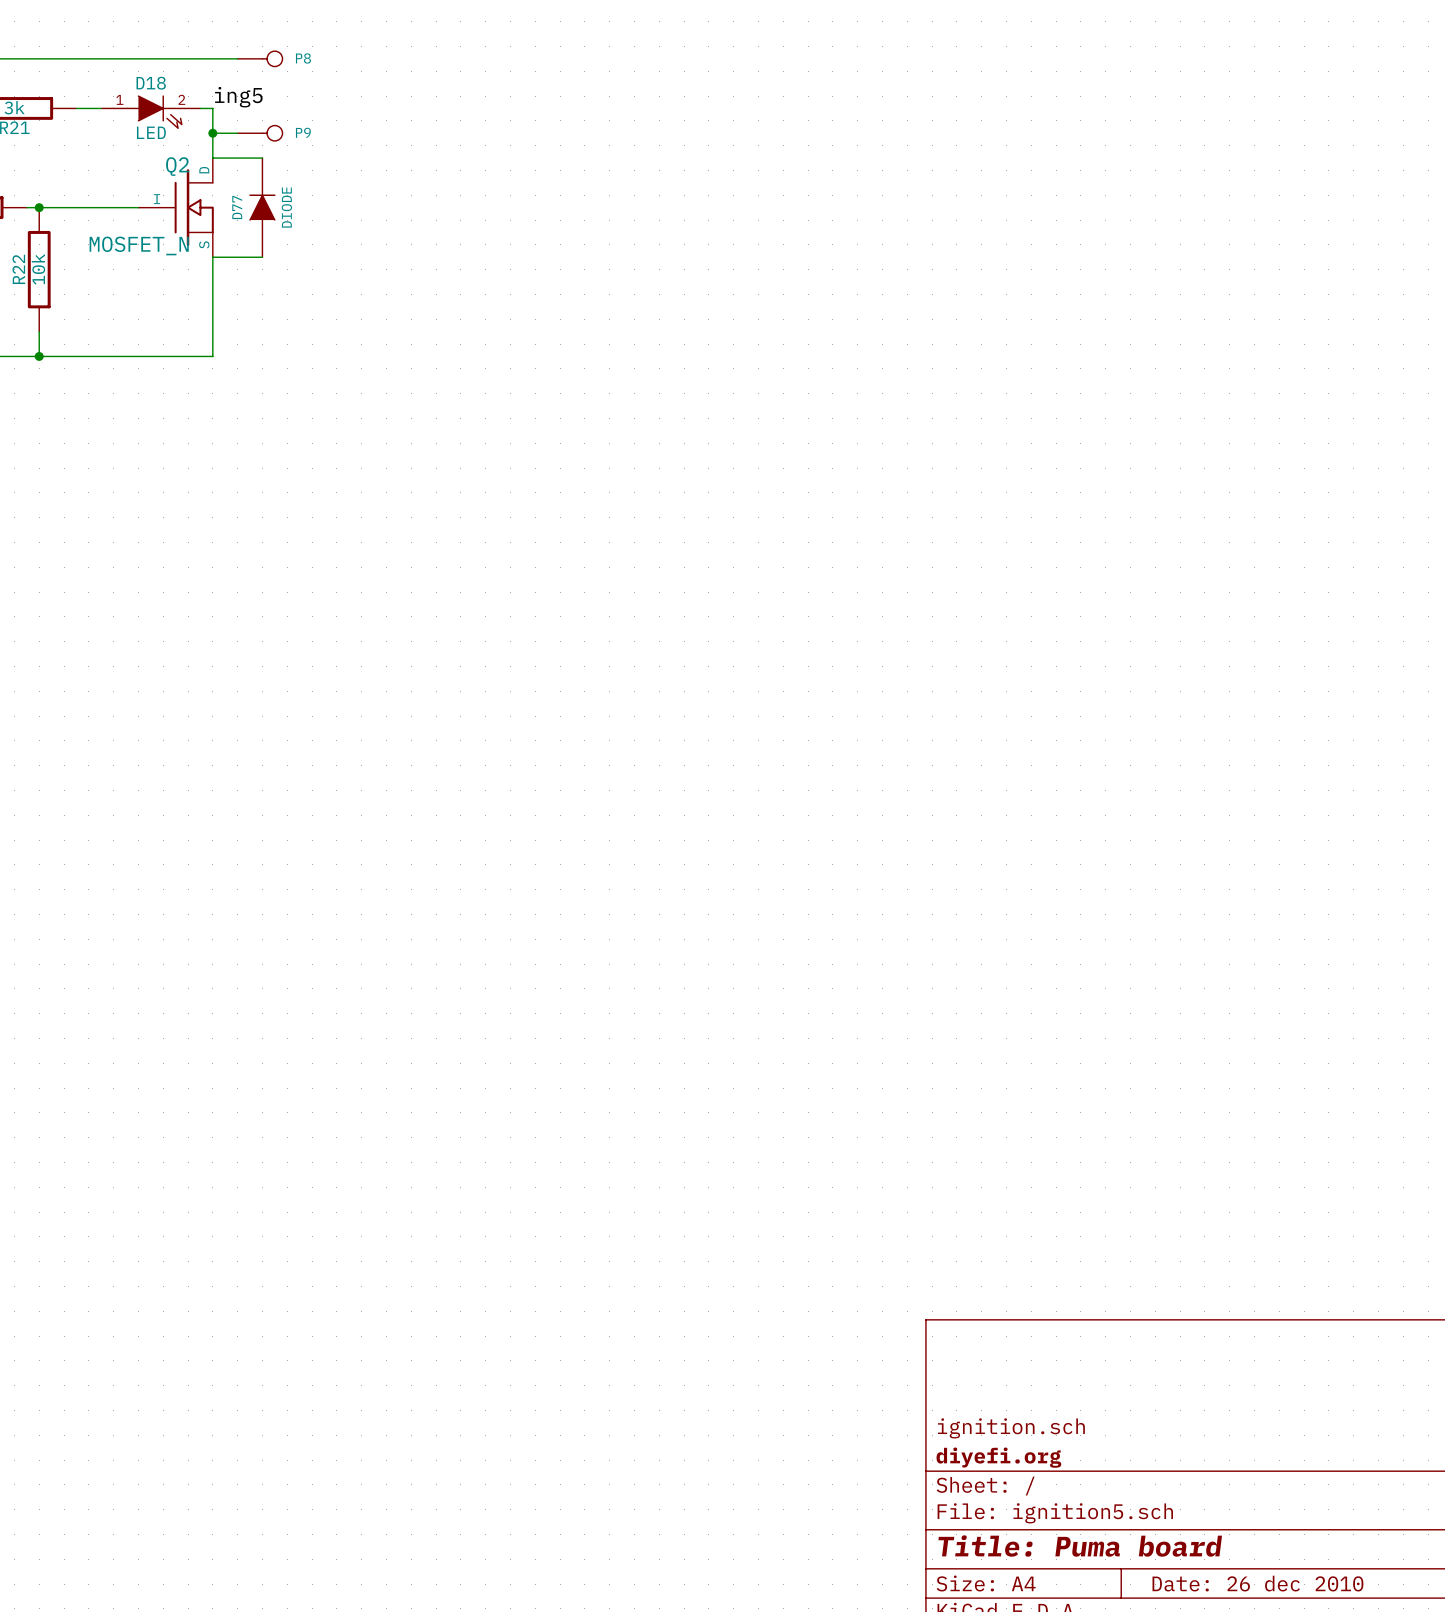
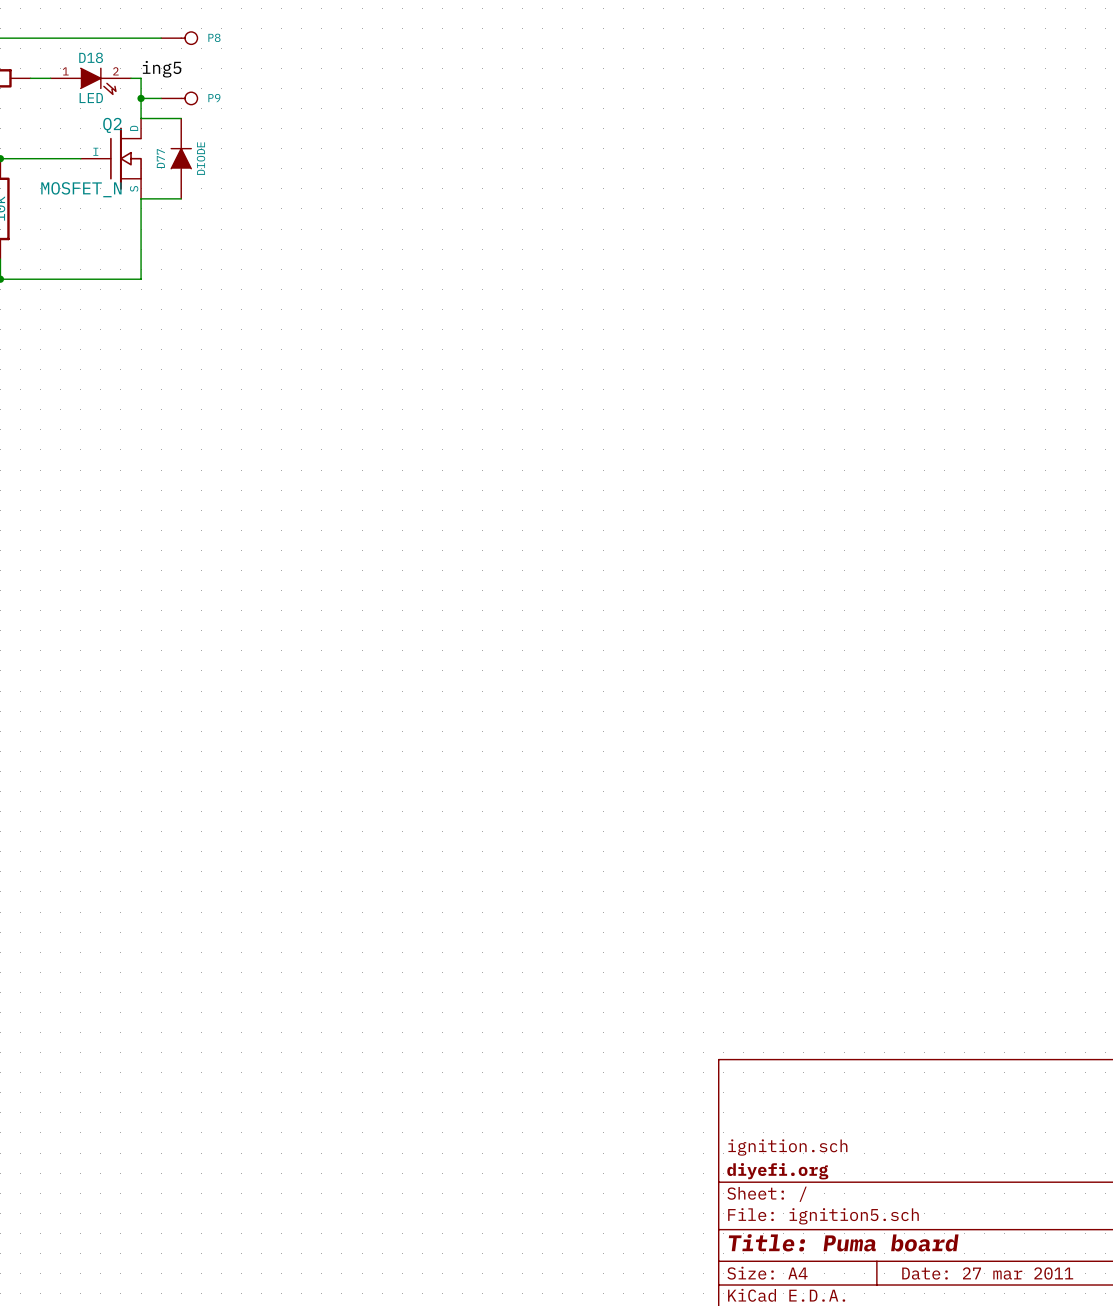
title block: Date: 26 dec 2010 (1257, 1583) -> Date: 27 mar 2011 (987, 1273)

